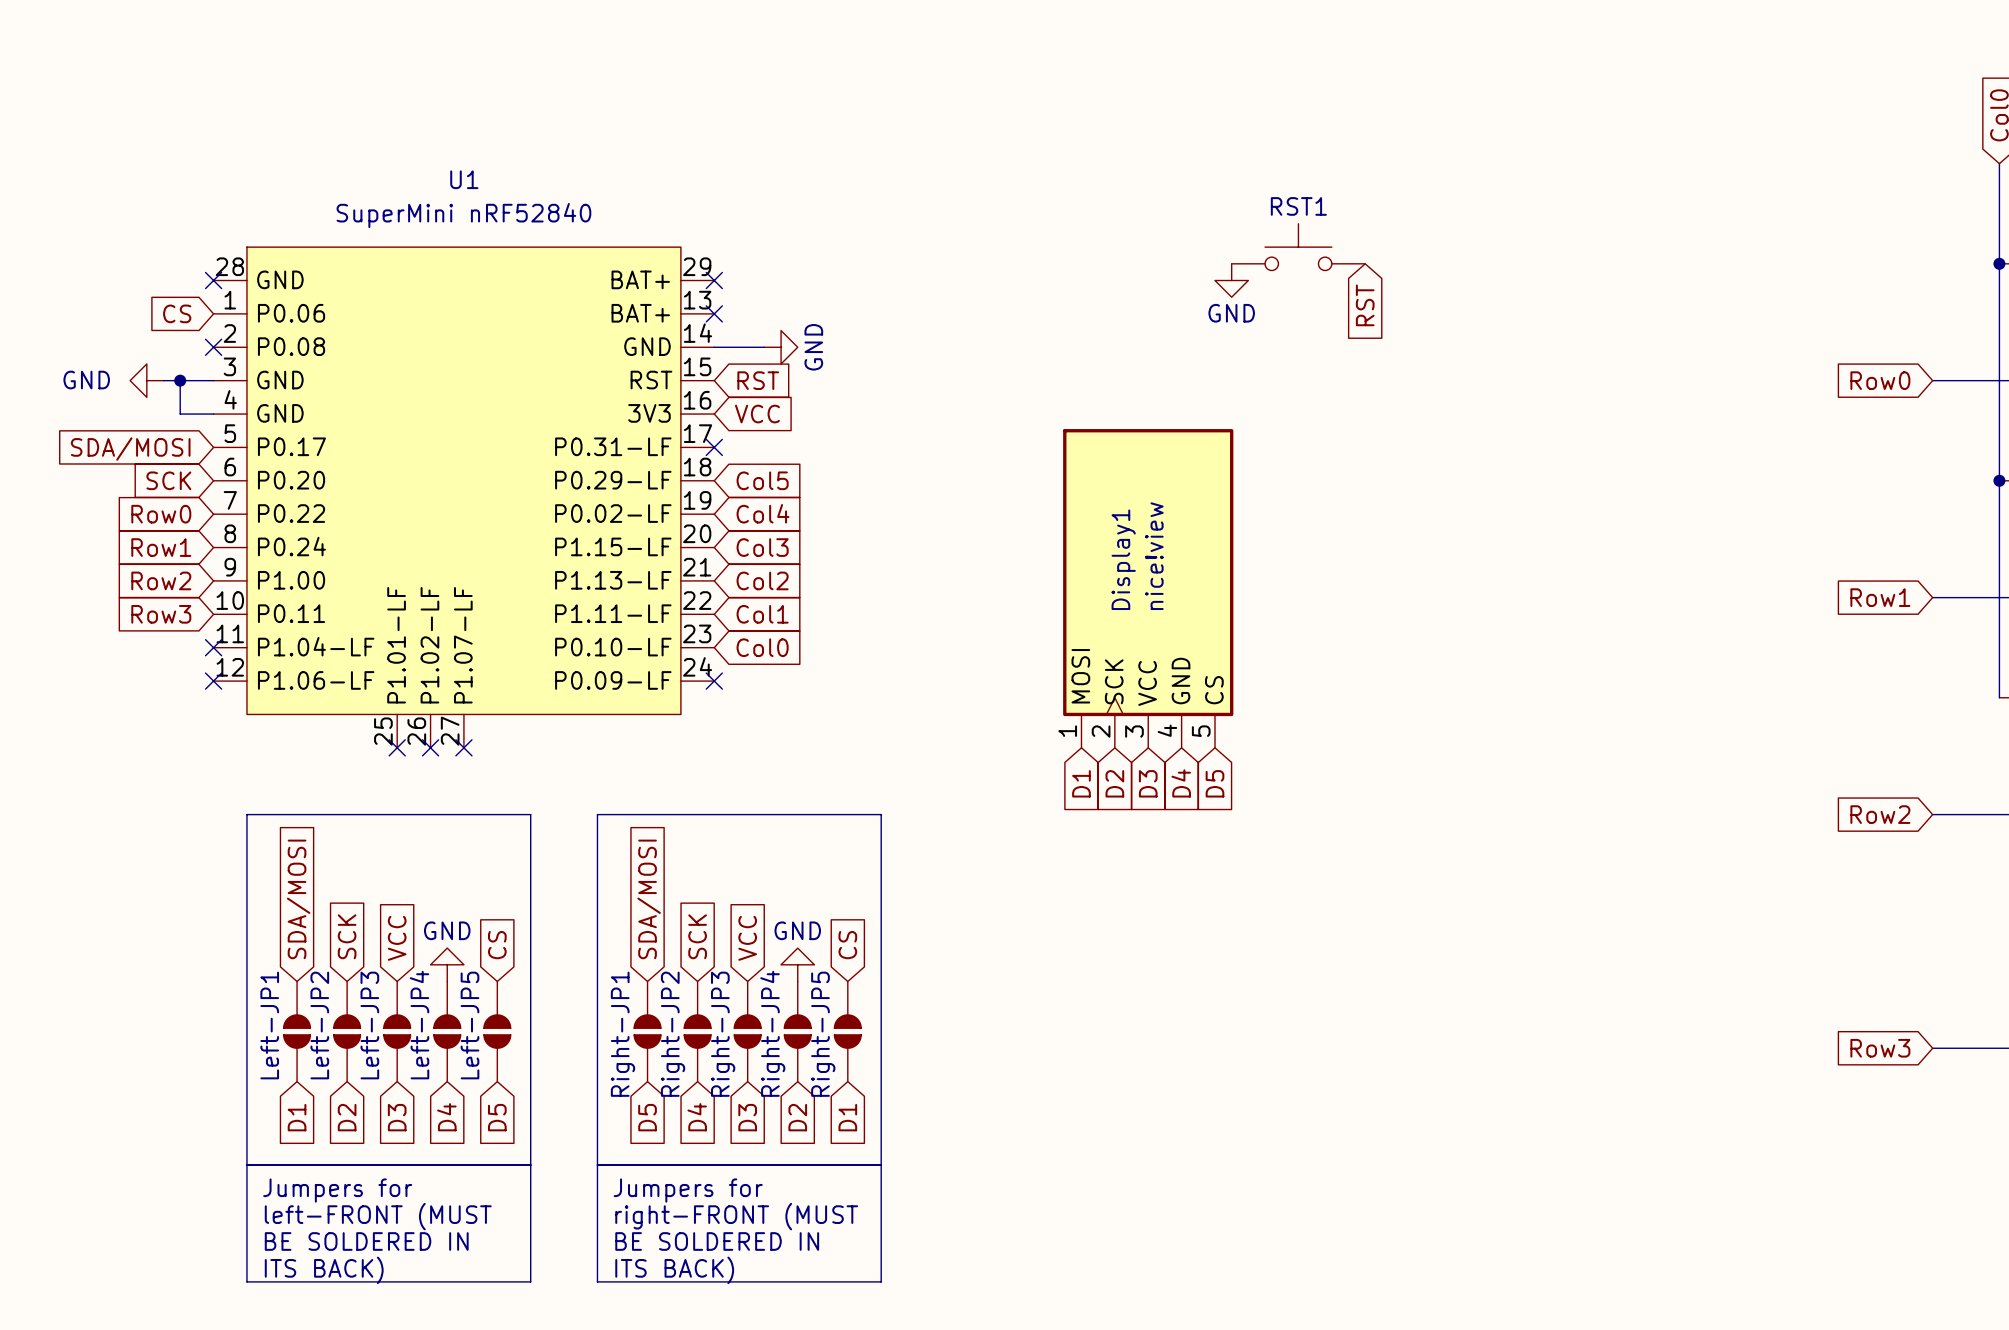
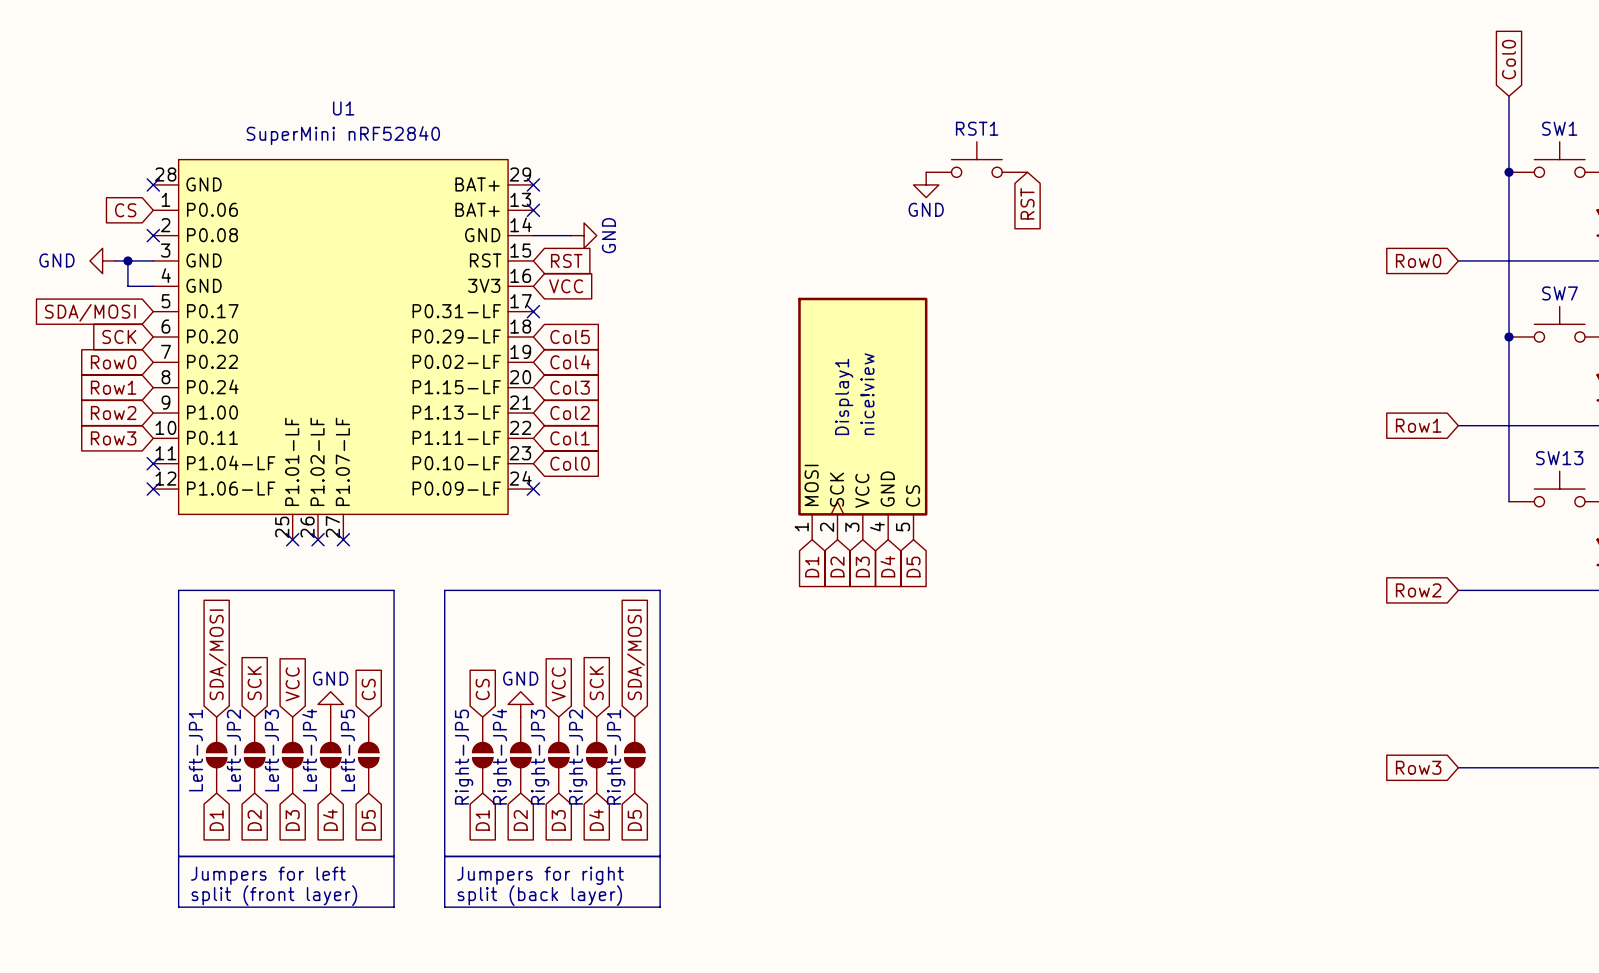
global label: SDA/MOSI (649, 899) -> CS (482, 689)
global label position: SCK (697, 936) -> SCK (596, 683)
global label: CS (847, 945) -> SDA/MOSI (635, 654)
power symbol position: GND (797, 964) -> GND (520, 704)
Right-JP4 name: Right-JP4 (772, 1033) -> Right-JP2 (578, 757)
Right-JP1 name: Right-JP1 (622, 1034) -> Right-JP5 (464, 757)
Right-JP2 name: Right-JP2 (673, 1034) -> Right-JP4 (501, 756)
Right-JP5 name: Right-JP5 (823, 1034) -> Right-JP1 (616, 757)
global label: D5 (647, 1117) -> D1 (482, 820)
global label: D4 (697, 1117) -> D2 (520, 820)
global label: D2 (797, 1117) -> D4 (596, 820)
global label: D1 (847, 1117) -> D5 (634, 820)
text: Jumpers for (337, 1190) -> Jumpers for left (268, 875)
text: Jumpers for (688, 1190) -> Jumpers for right (540, 875)
text: left-FRONT (MUST (378, 1216) -> split (front layer) (274, 895)
text: right-FRONT (MUST (736, 1216) -> split (back layer) (539, 895)
line: (246, 1231) (246, 1281) (530, 1281) (530, 1231) -> (178, 907) (394, 907)
line: (597, 1231) (597, 1281) (881, 1281) (881, 1231) -> (444, 907) (660, 907)
text: BE SOLDERED IN (366, 1241) -> none
text: BE SOLDERED IN (717, 1241) -> none
text: ITS BACK) (324, 1270) -> none
text: ITS BACK) (674, 1270) -> none

